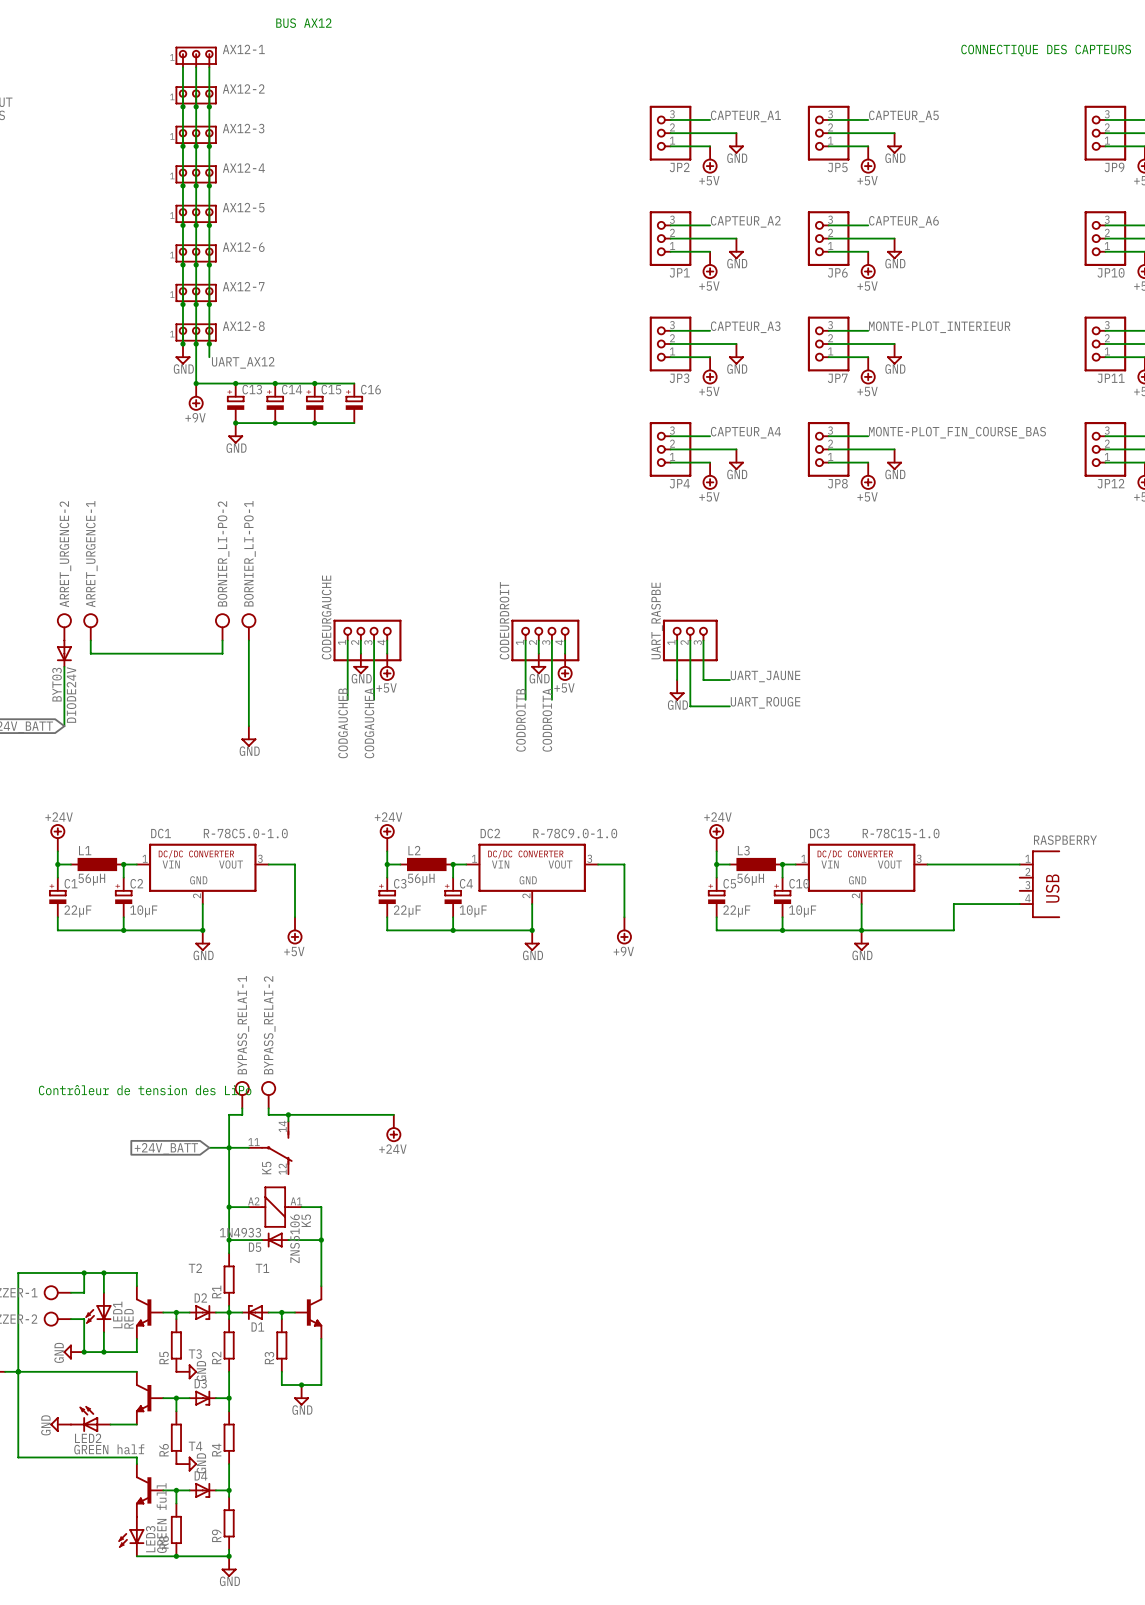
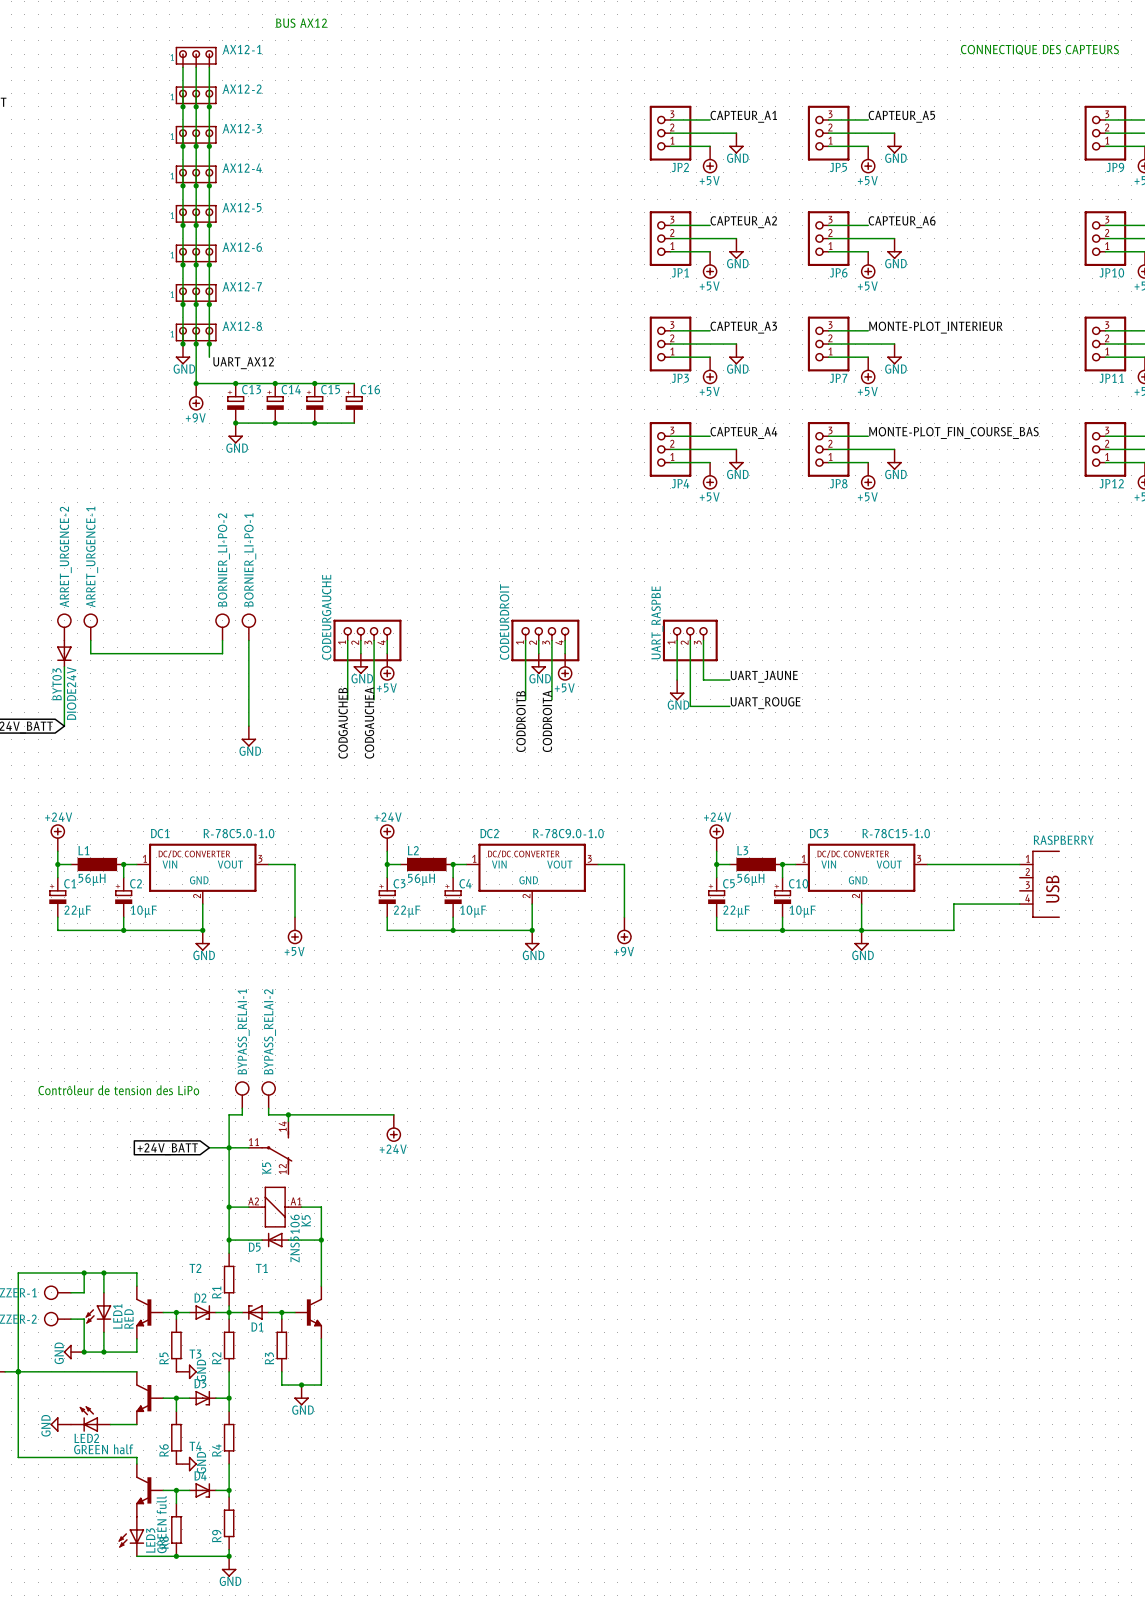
D5 value: 1N4933 (240, 1232) -> none

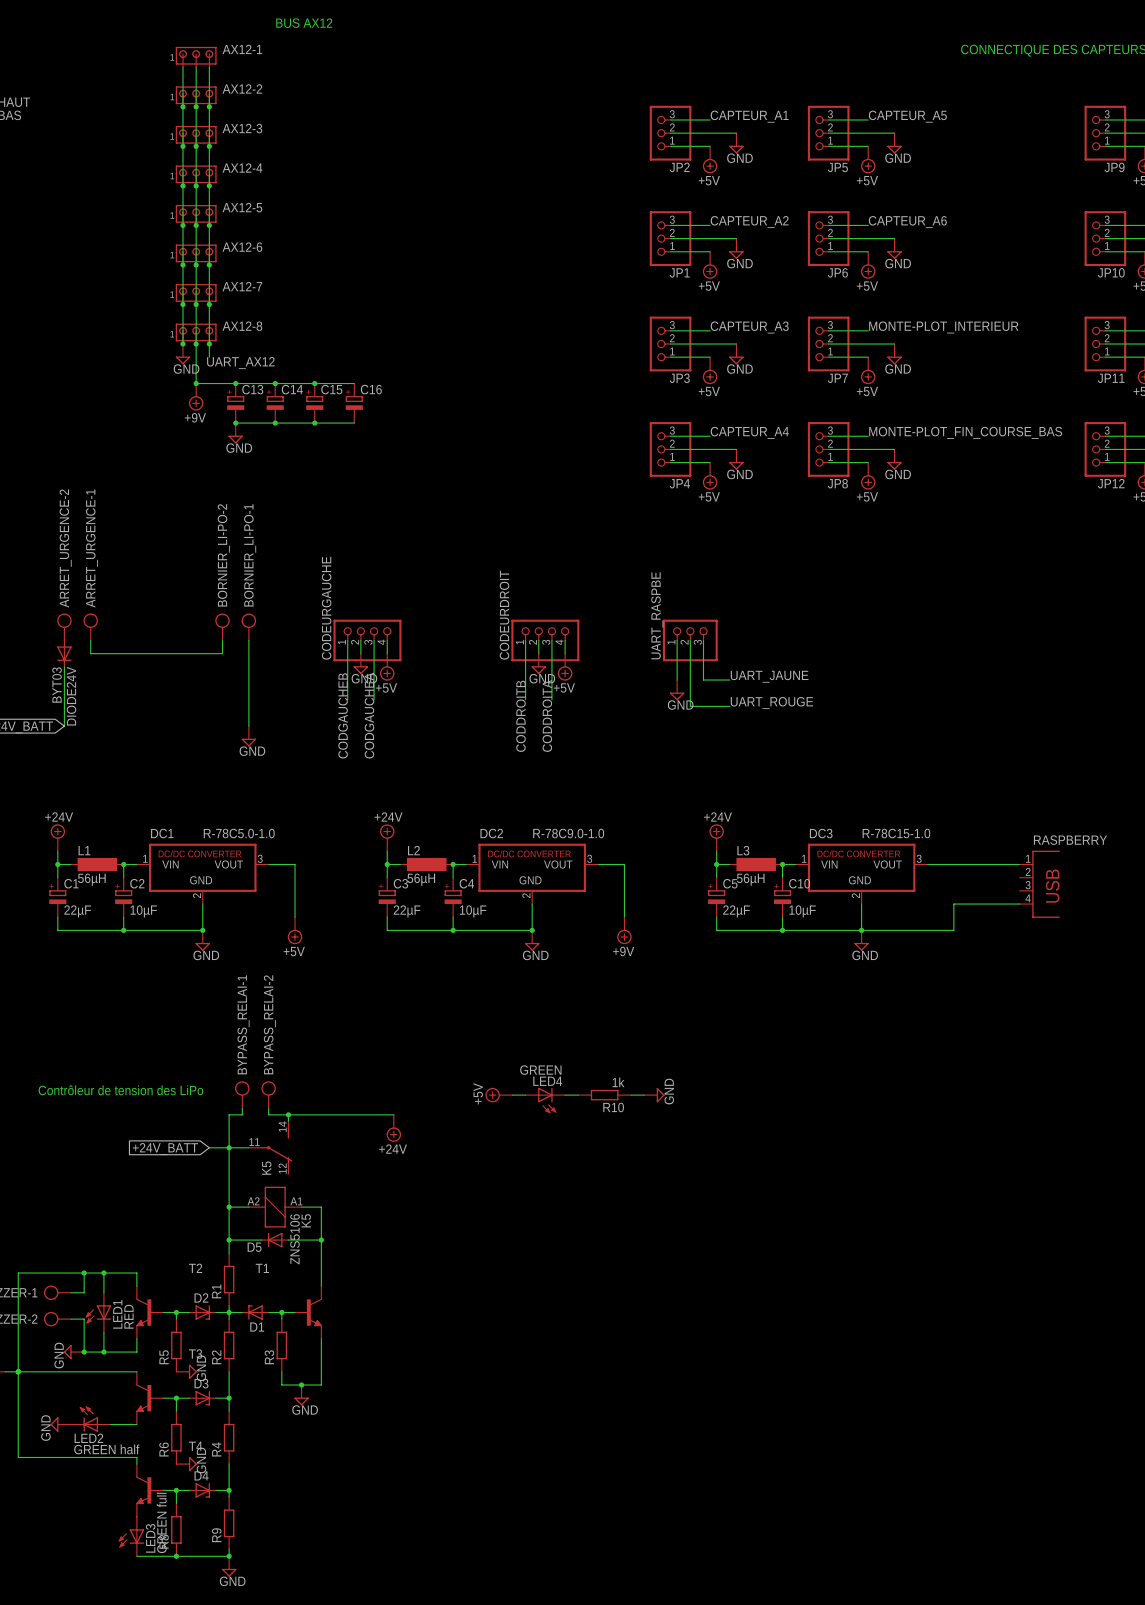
power symbol: none -> +5V (498, 1095)
wire: none -> (512, 1095) (525, 1095)
wire: none -> (565, 1095) (578, 1095)
R10: none -> 1k (604, 1095)
wire: none -> (631, 1095) (644, 1095)
power symbol: none -> GND (654, 1095)
LED4: none -> GREEN (545, 1100)

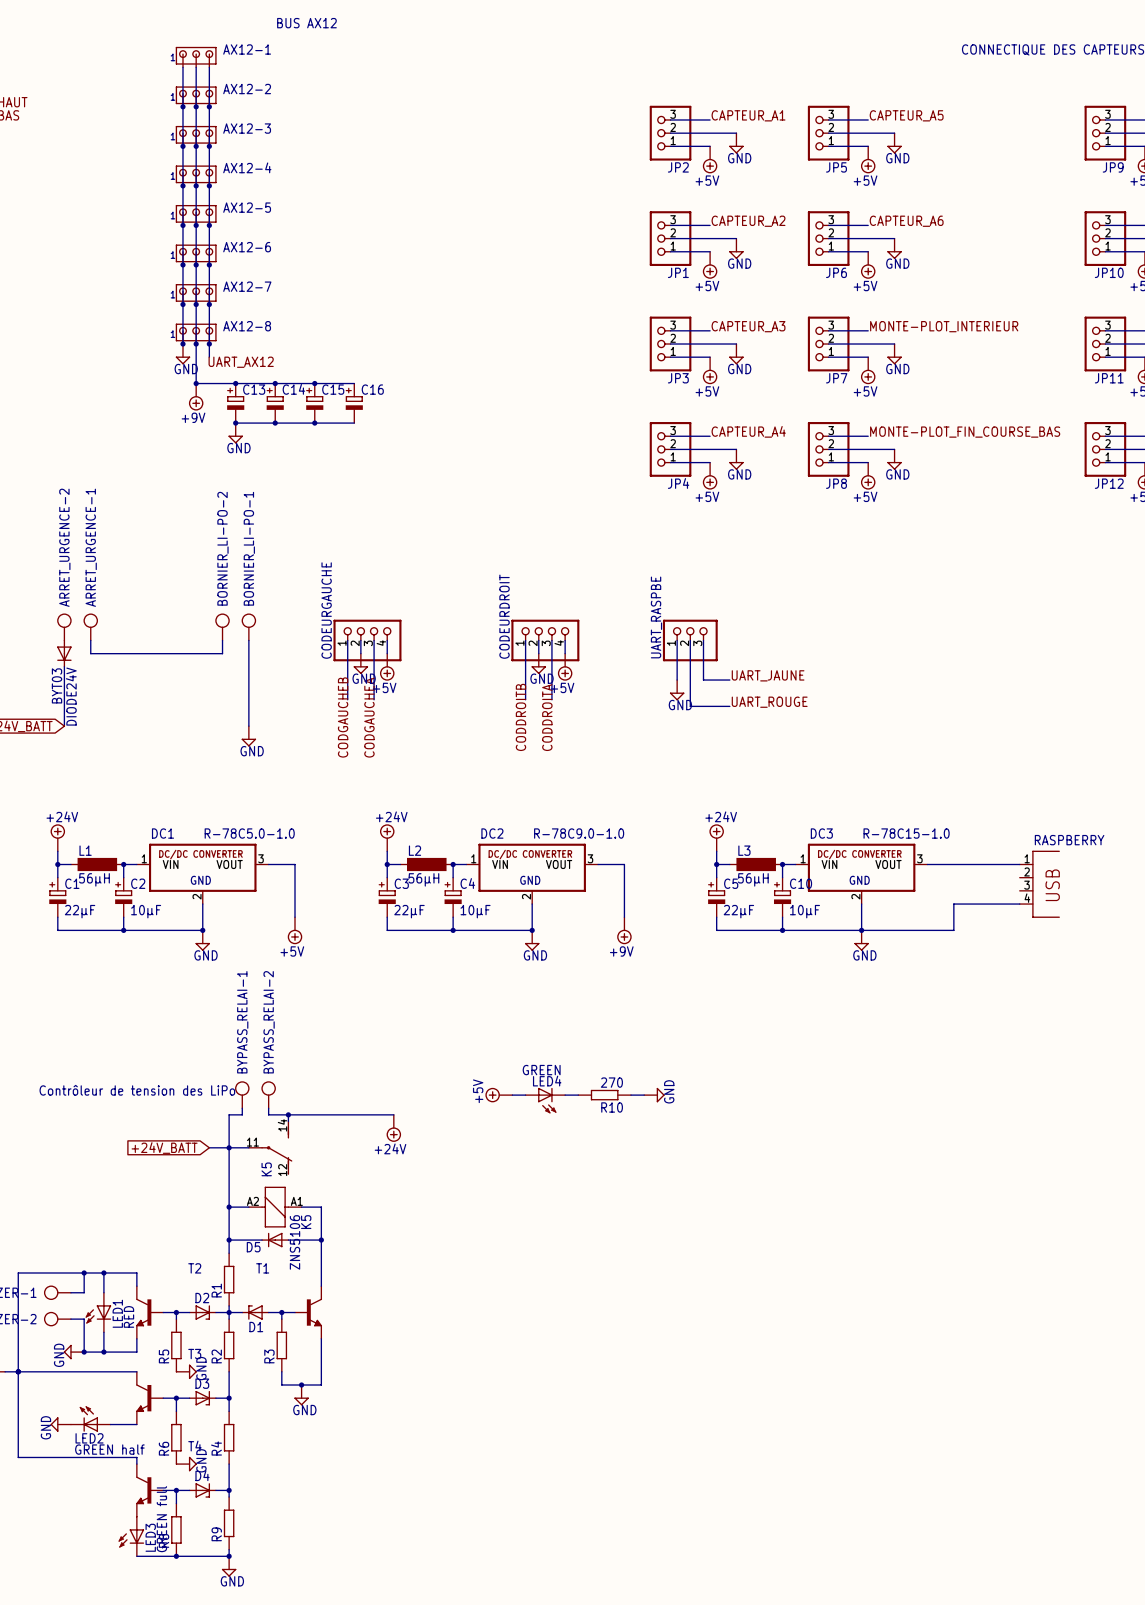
R10 value: 1k (618, 1082) -> 270 (611, 1082)

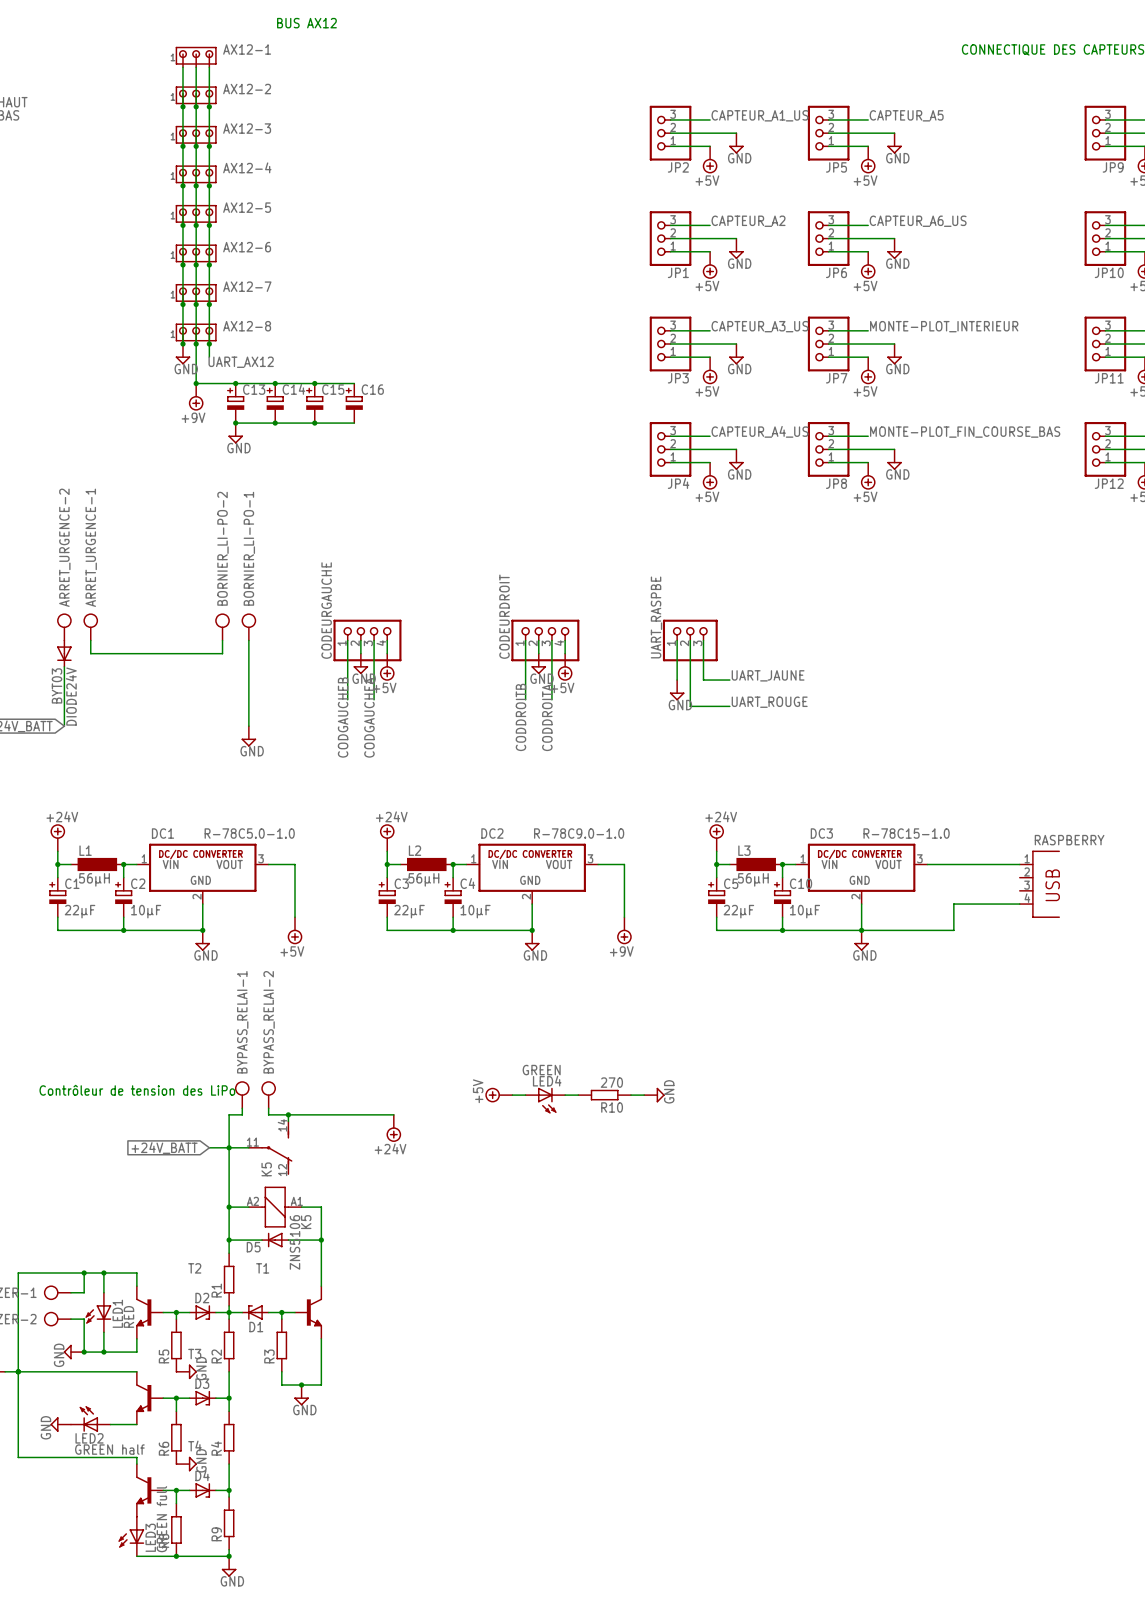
label: CAPTEUR_A1 (748, 115) -> CAPTEUR_A1_US (759, 115)
label: CAPTEUR_A6 (906, 221) -> CAPTEUR_A6_US (918, 221)
label: CAPTEUR_A3 (748, 326) -> CAPTEUR_A3_US (759, 326)
label: CAPTEUR_A4 (748, 431) -> CAPTEUR_A4_US (759, 431)

